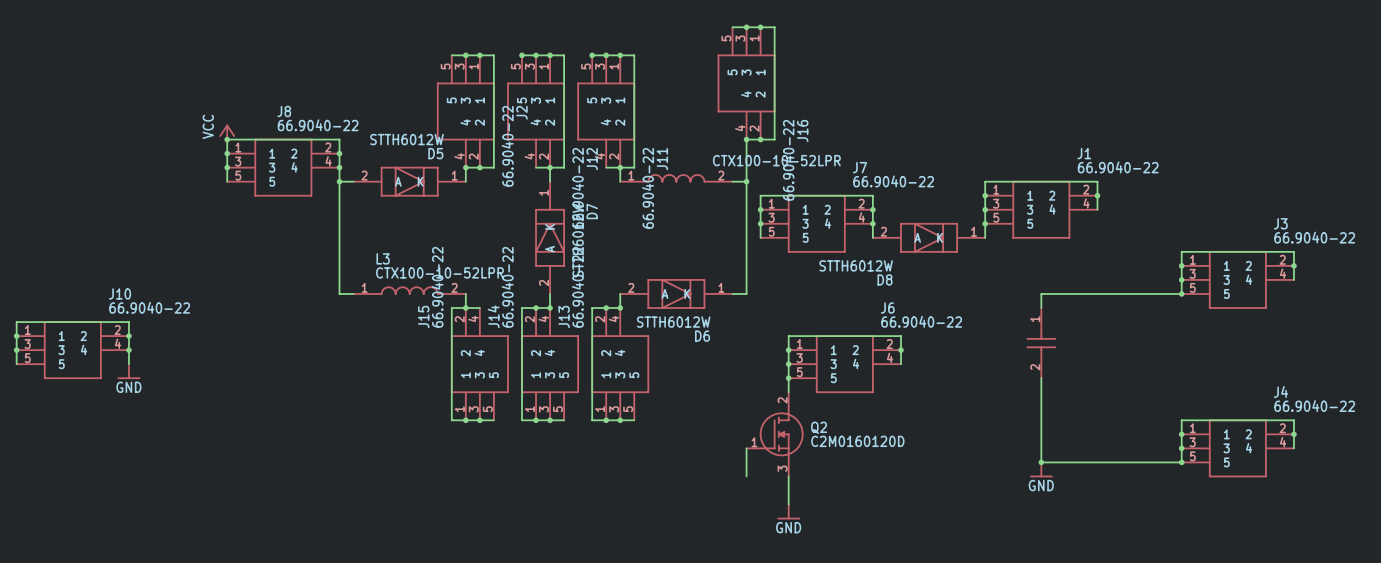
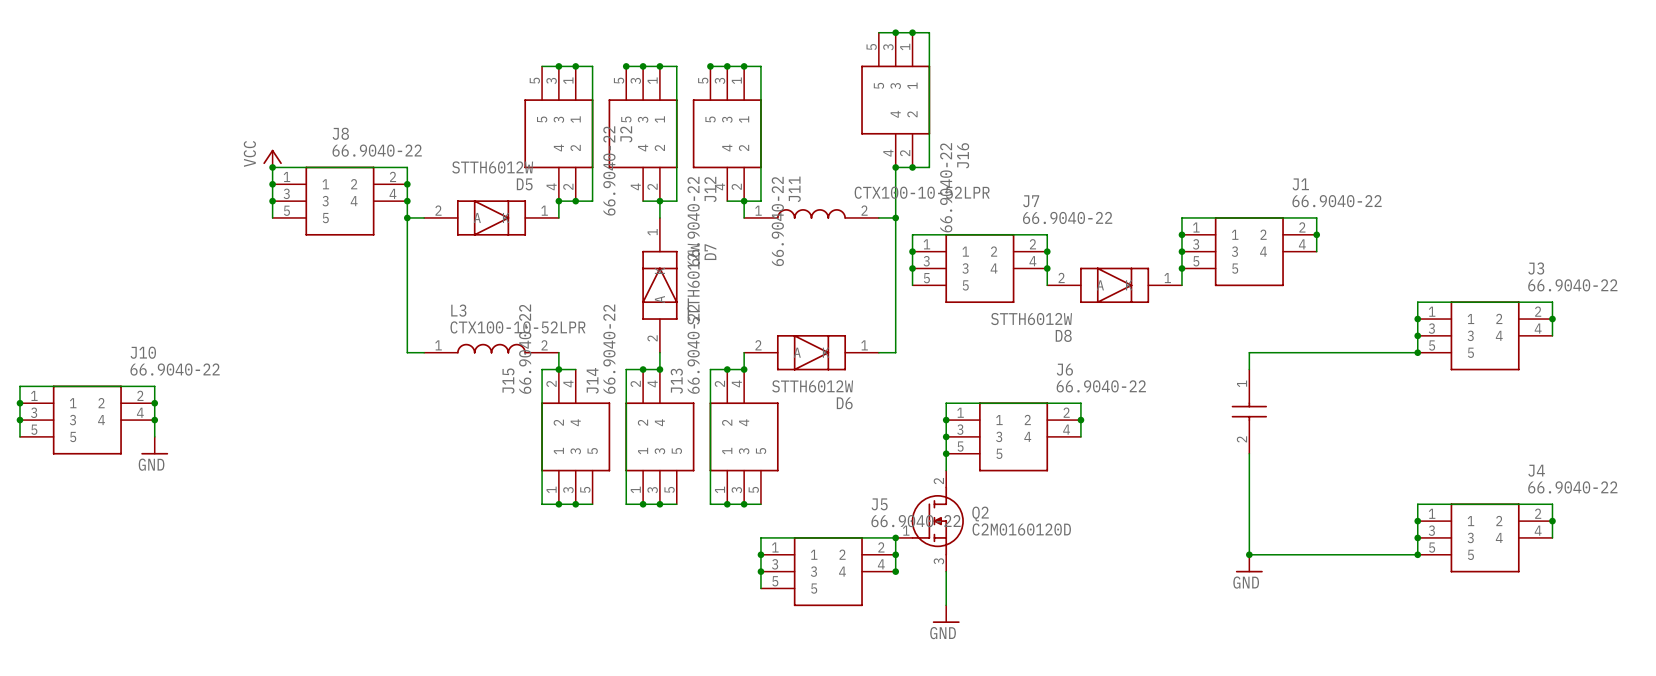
wire: none -> (895, 537) (760, 537) (760, 588)
junction: none -> (895, 537)
junction: none -> (760, 554)
junction: none -> (895, 554)
junction: none -> (760, 571)
J5: none -> 66.9040-22 (828, 571)
junction: none -> (895, 571)

